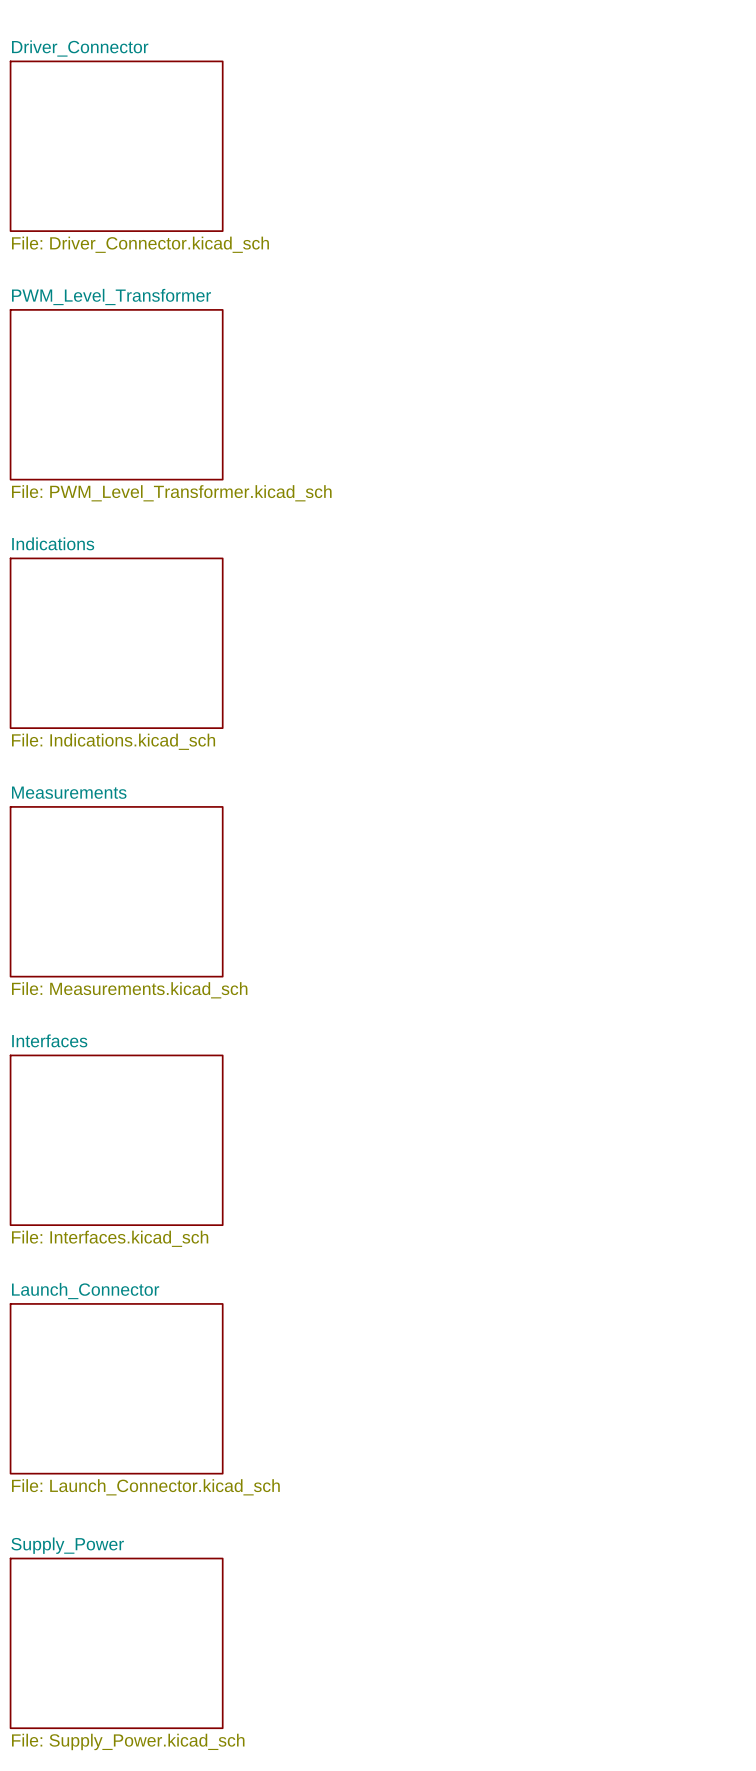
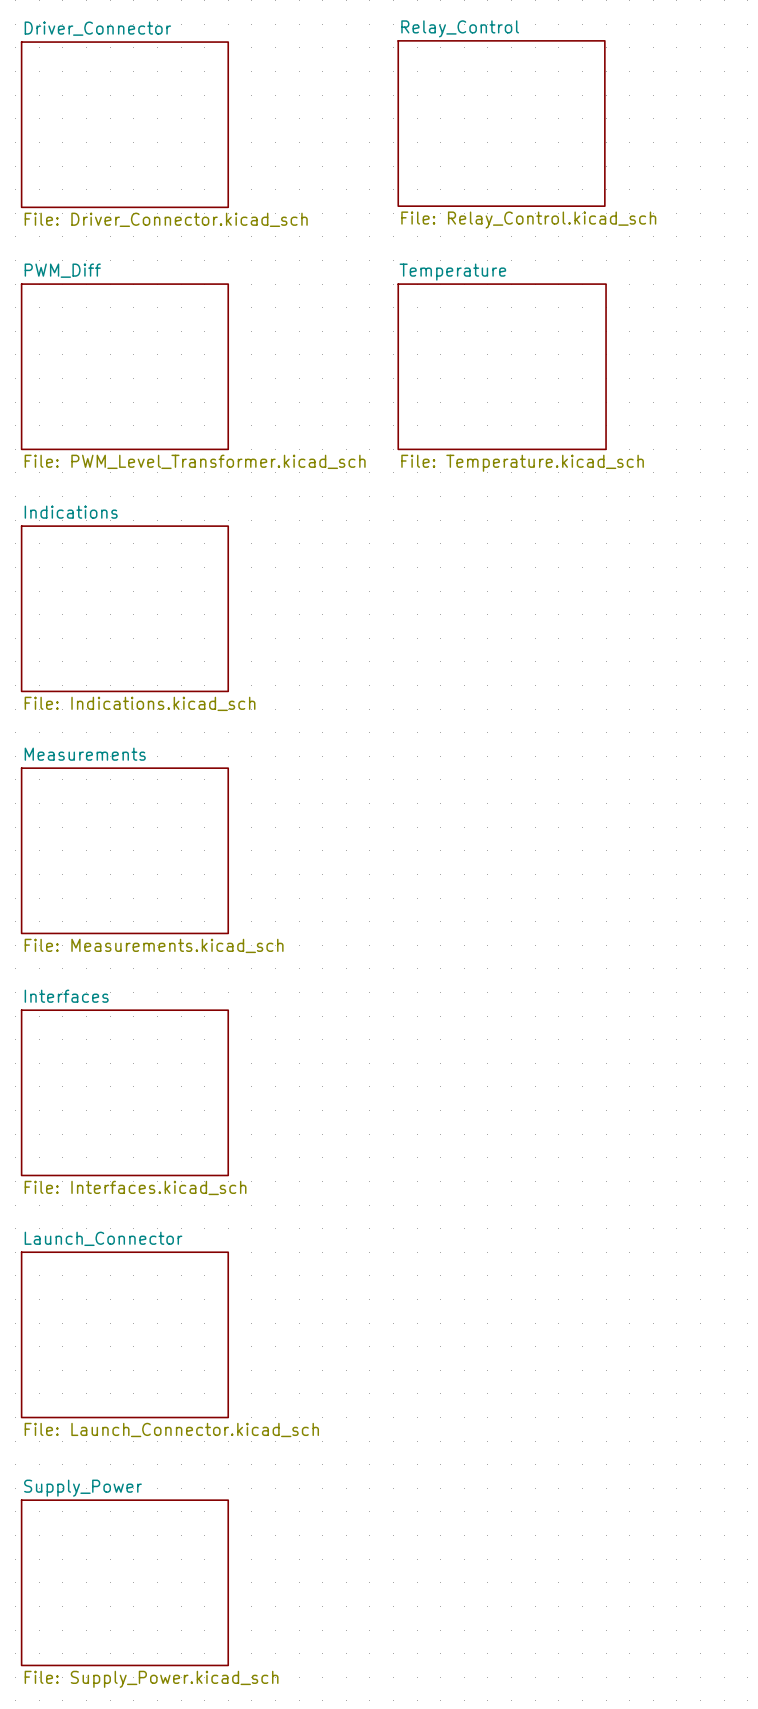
sheet Relay_Control: none -> File: Relay_Control.kicad_sch (501, 123)
sheet PWM_Level_Transformer name: PWM_Level_Transformer (111, 297) -> PWM_Diff (62, 270)
sheet Temperature: none -> File: Temperature.kicad_sch (502, 366)

